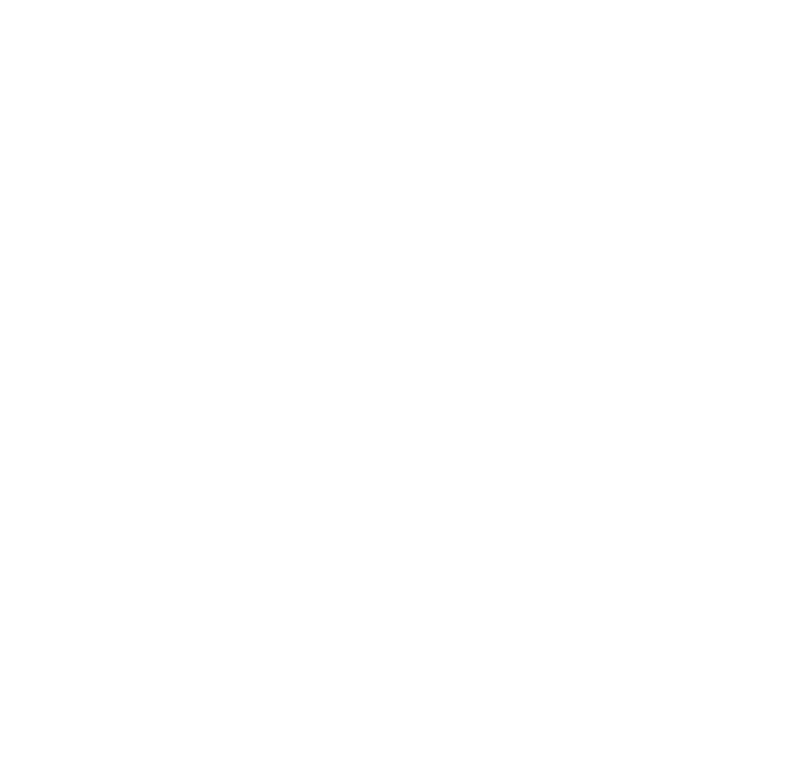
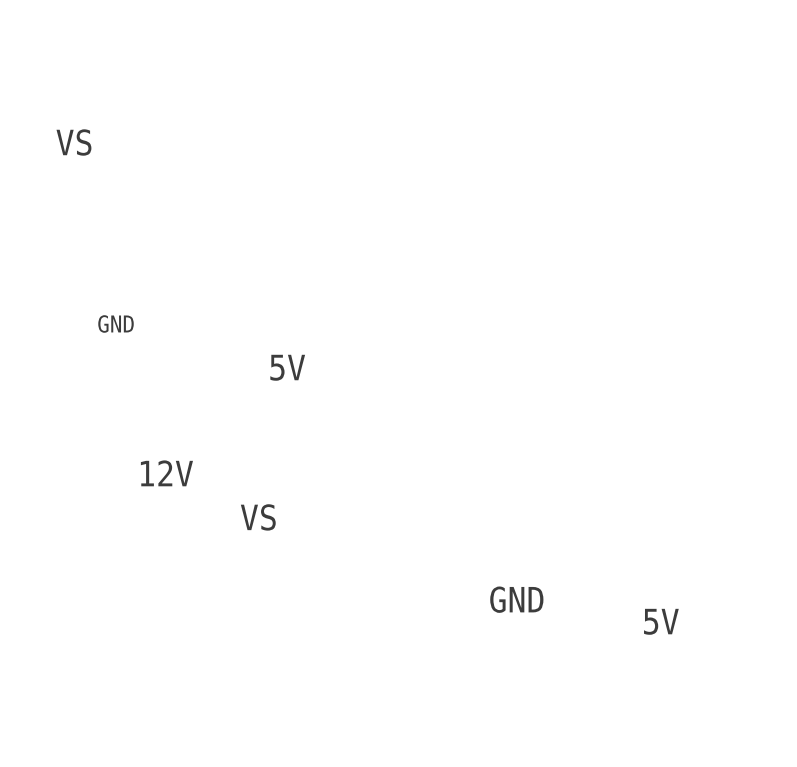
text: none -> VS (73, 142)
text: none -> GND (116, 323)
text: none -> 5V (287, 367)
text: none -> 12V (166, 473)
text: none -> VS (258, 517)
text: none -> GND (516, 599)
text: none -> 5V (661, 621)

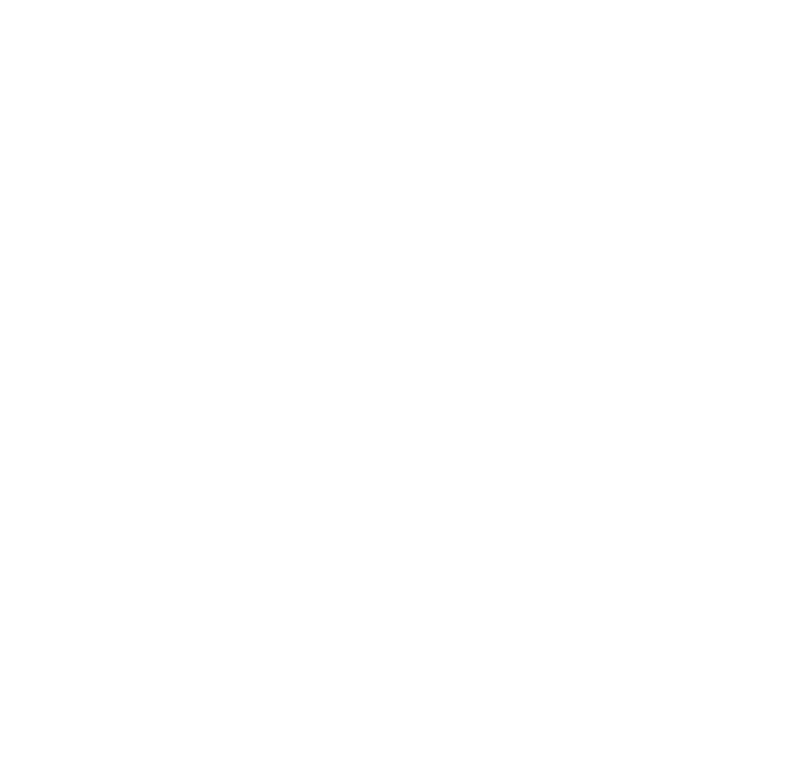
text: VS (73, 142) -> none
text: GND (116, 323) -> none
text: 5V (287, 367) -> none
text: 12V (166, 473) -> none
text: VS (258, 517) -> none
text: GND (516, 599) -> none
text: 5V (661, 621) -> none

